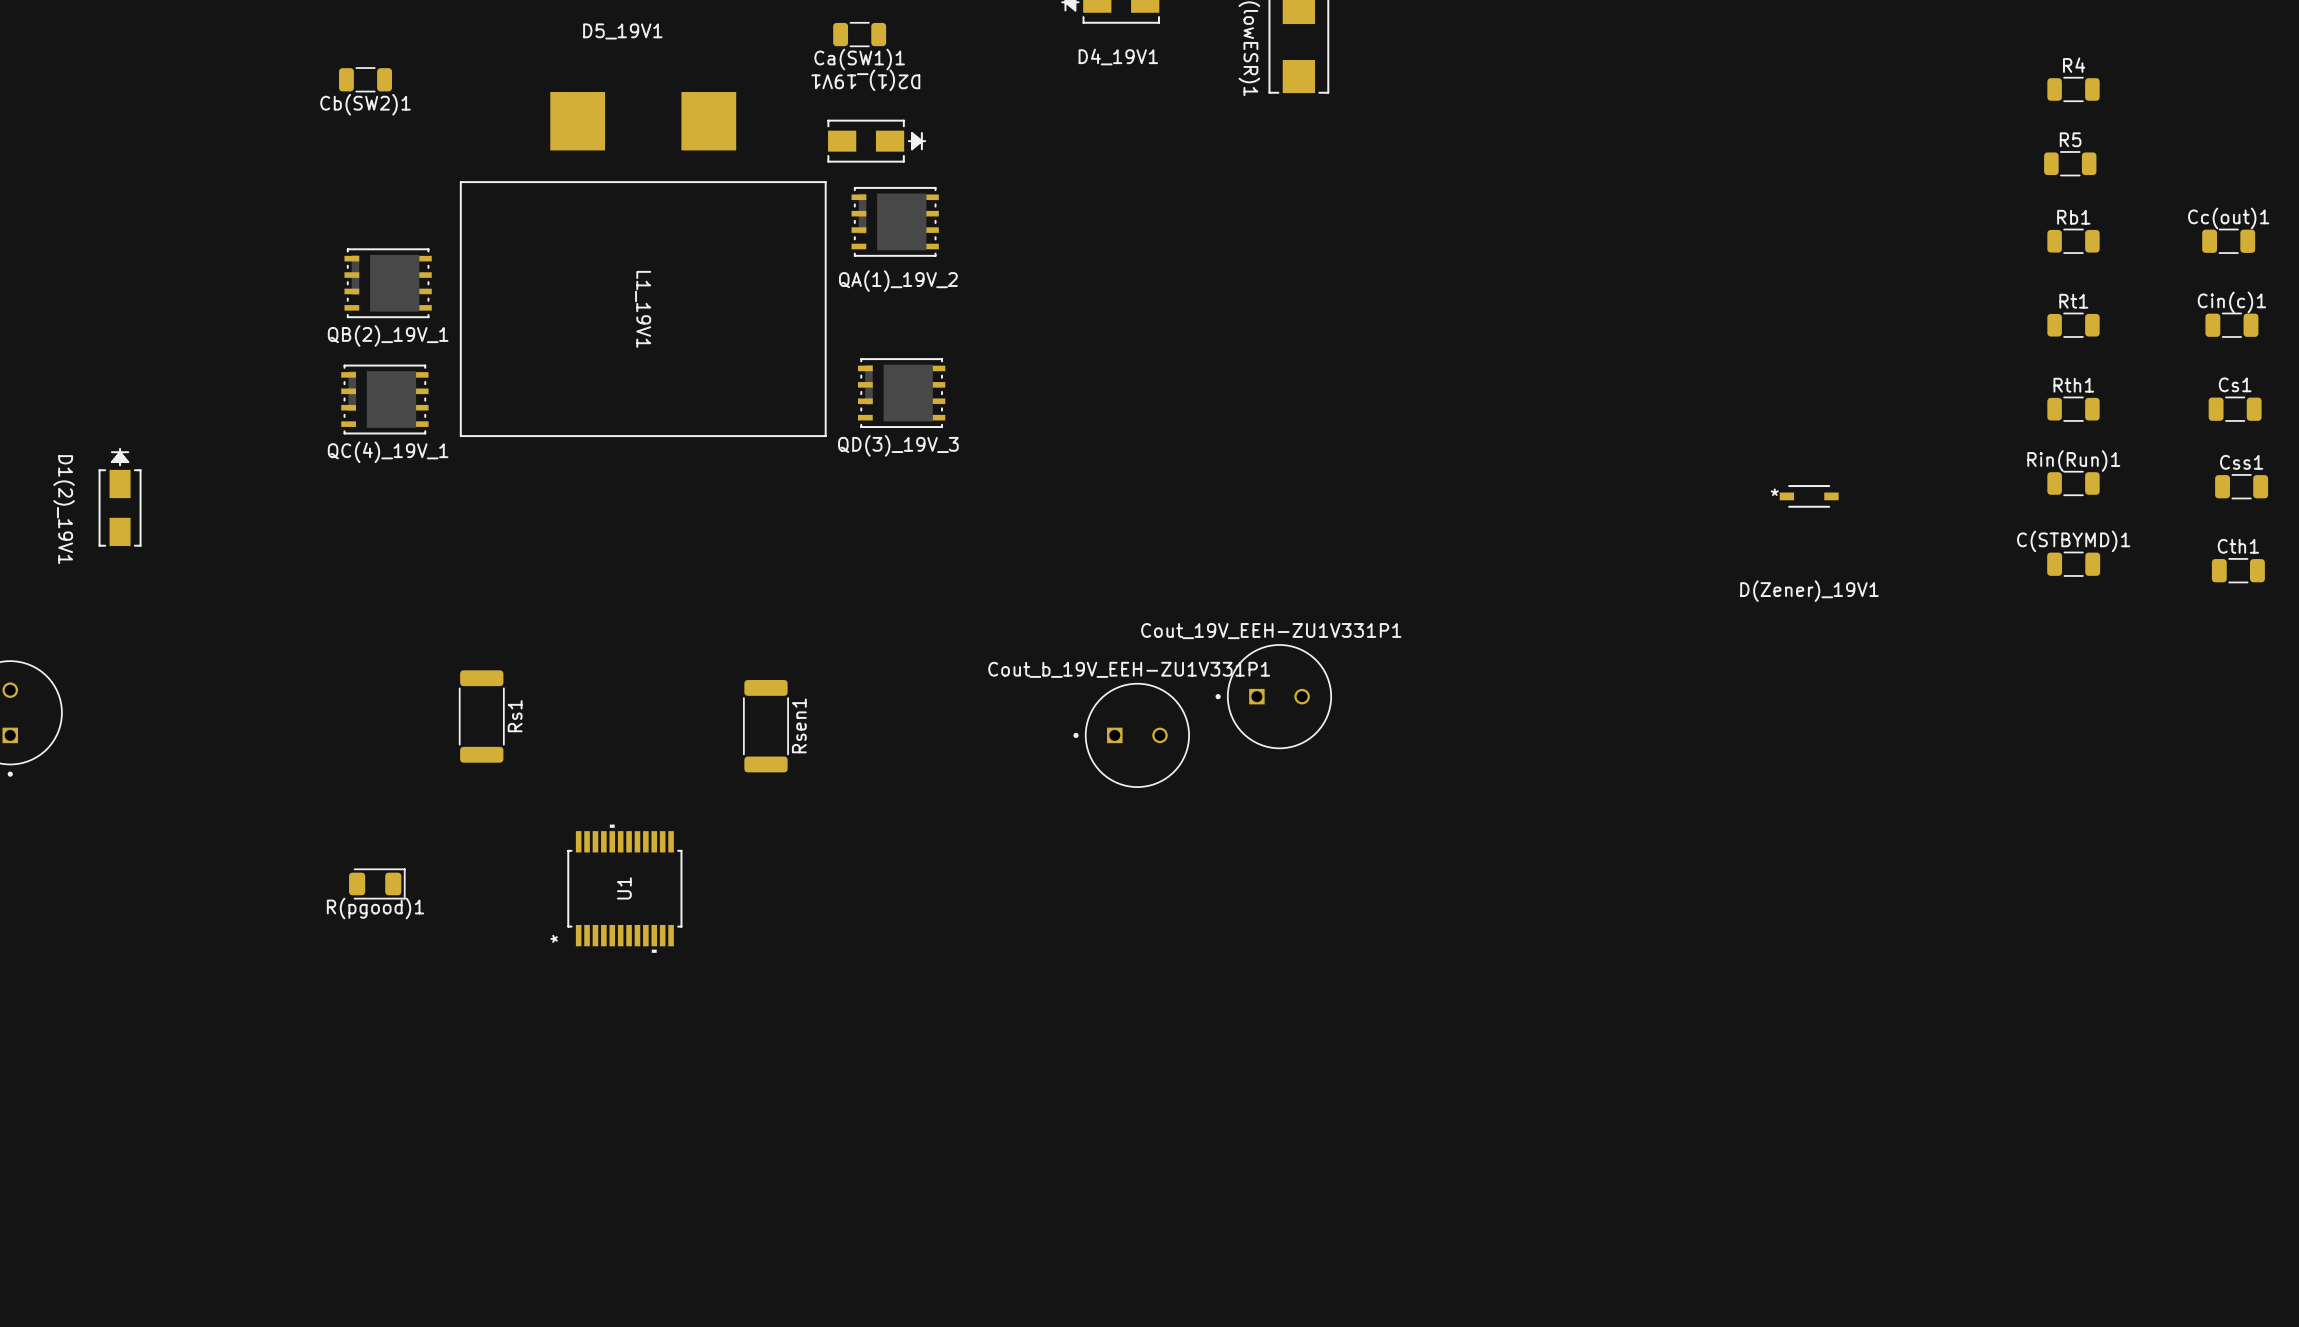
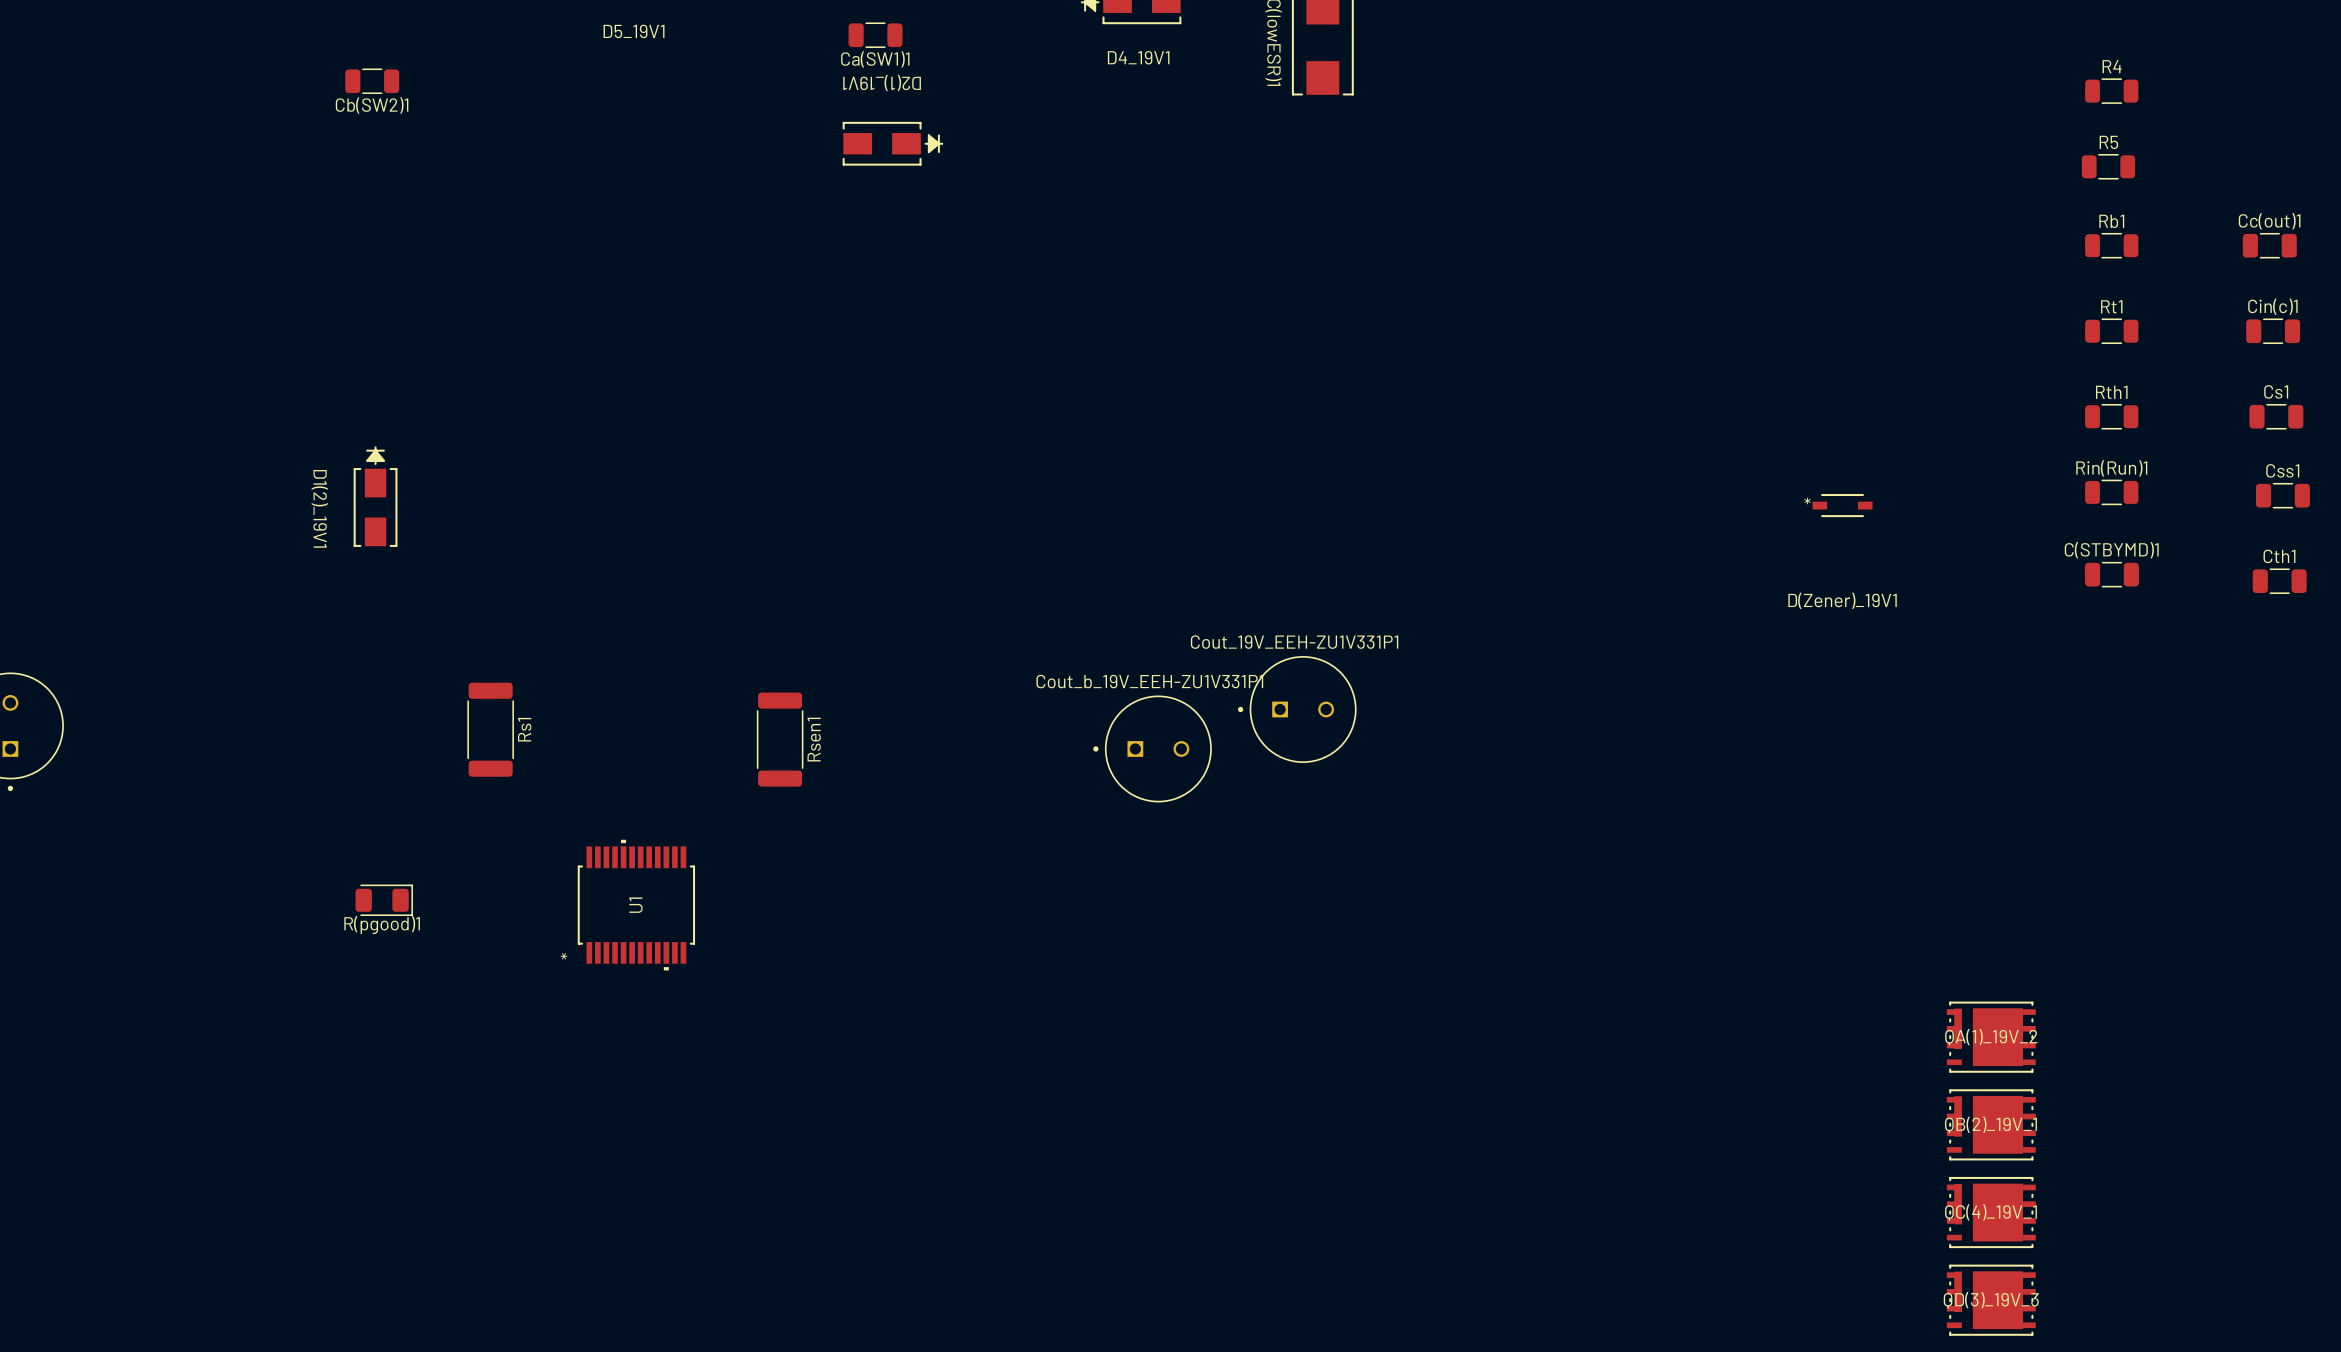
QA(1)_19V_2 position: (895, 221) -> (1991, 1037)
L1_19V1: (643, 264) -> none
QA(1)_19V_2 name position: QA(1)_19V_2 (898, 281) -> QA(1)_19V_2 (1991, 1037)
QB(2)_19V_1 position: (388, 283) -> (1991, 1124)
QB(2)_19V_1 name position: QB(2)_19V_1 (388, 335) -> QB(2)_19V_1 (1990, 1124)
QD(3)_19V_3 position: (901, 393) -> (1991, 1300)
QC(4)_19V_1 position: (384, 399) -> (1991, 1212)
QD(3)_19V_3 name position: QD(3)_19V_3 (898, 445) -> QD(3)_19V_3 (1991, 1300)
QC(4)_19V_1 name position: QC(4)_19V_1 (388, 452) -> QC(4)_19V_1 (1990, 1212)
D1(2)_19V1 position: (120, 497) -> (375, 496)

